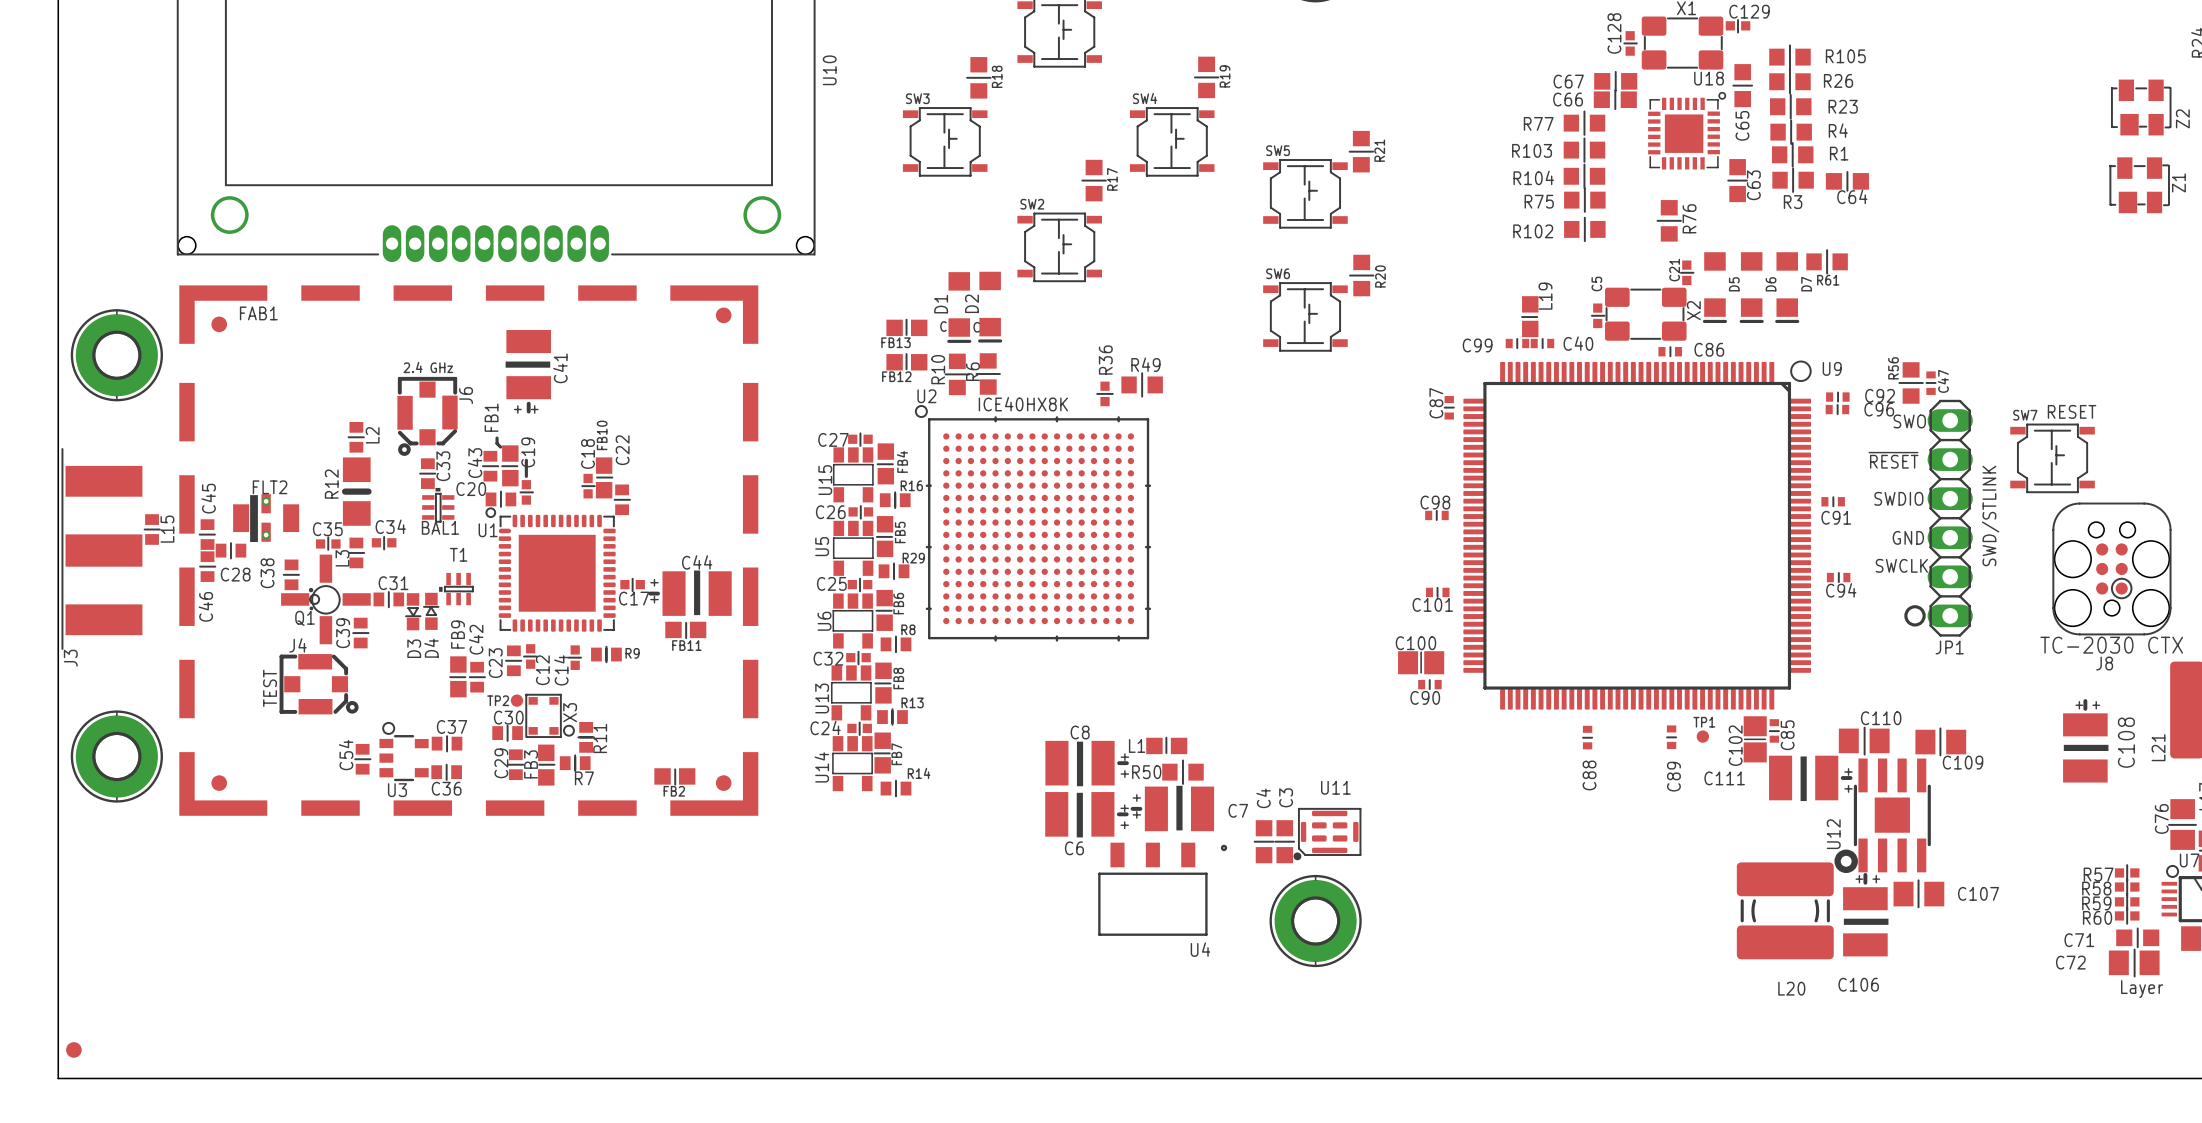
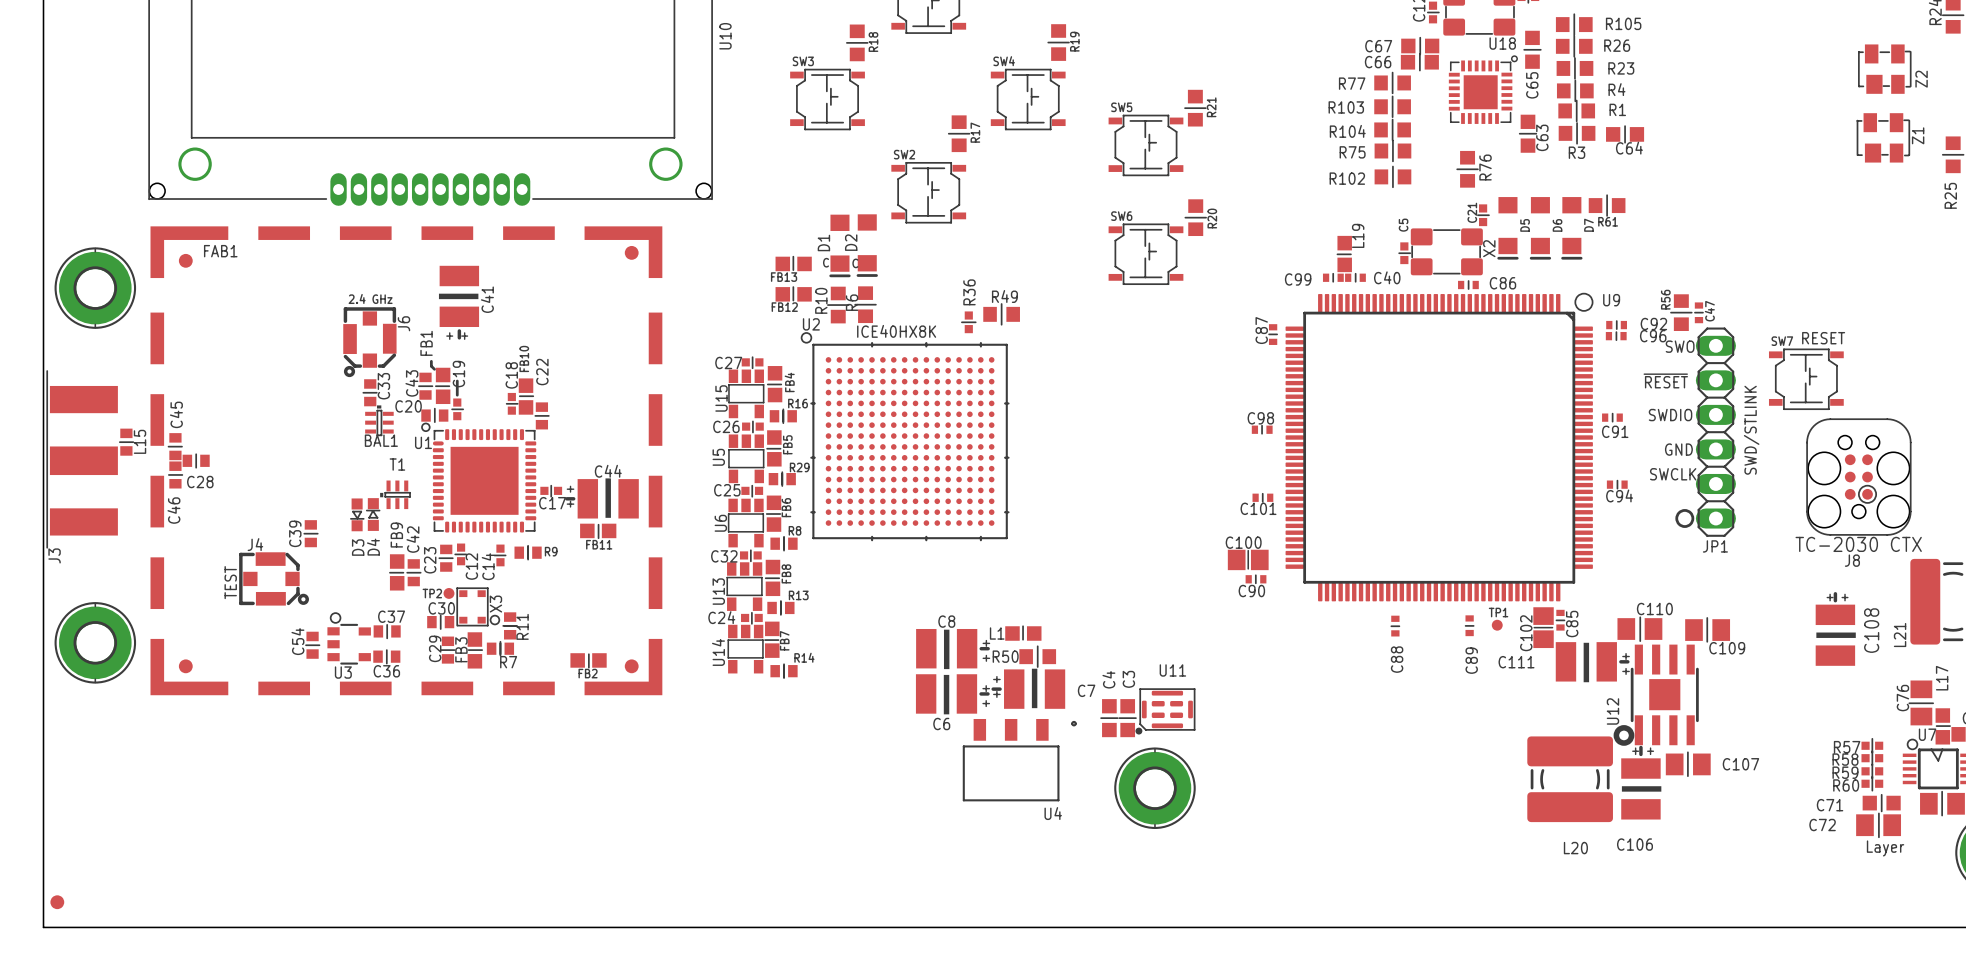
L2: (356, 437) -> none
R12: (356, 491) -> none
FLT2: (266, 518) -> none
C35: (328, 543) -> none
C34: (384, 543) -> none
L3: (356, 552) -> none
C38: (291, 574) -> none
Q1: (325, 599) -> none
C31: (388, 599) -> none

